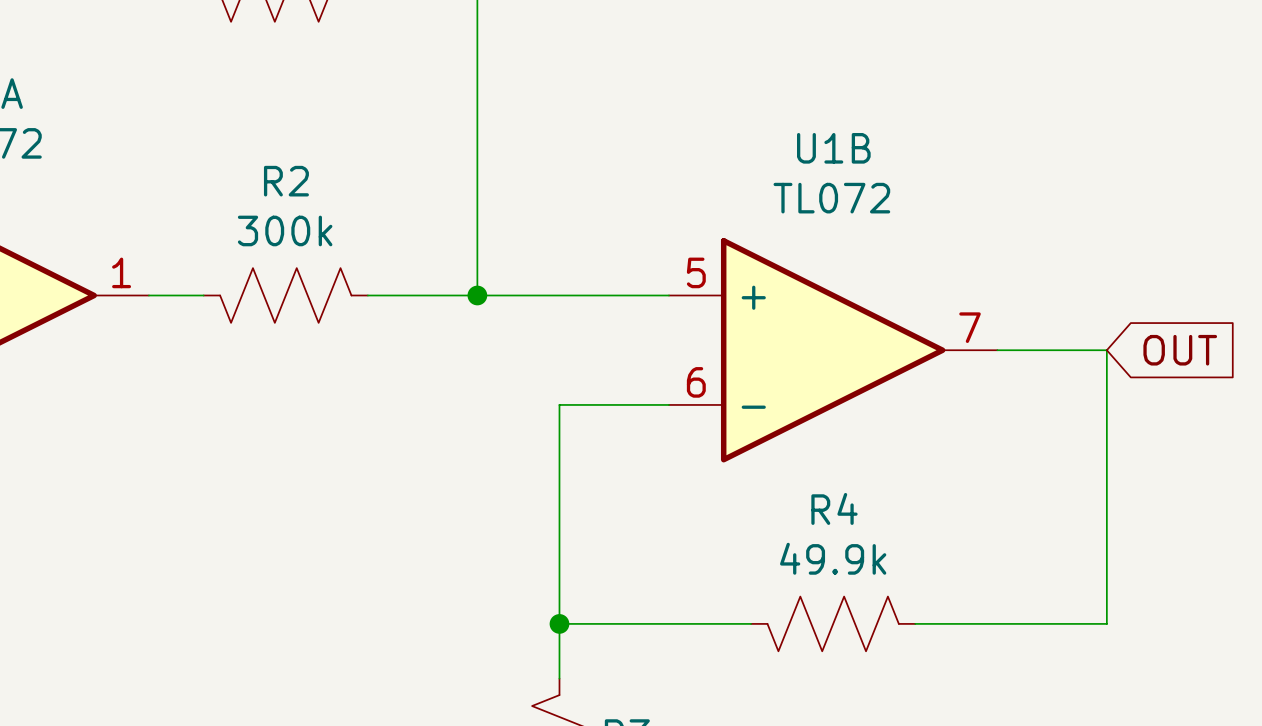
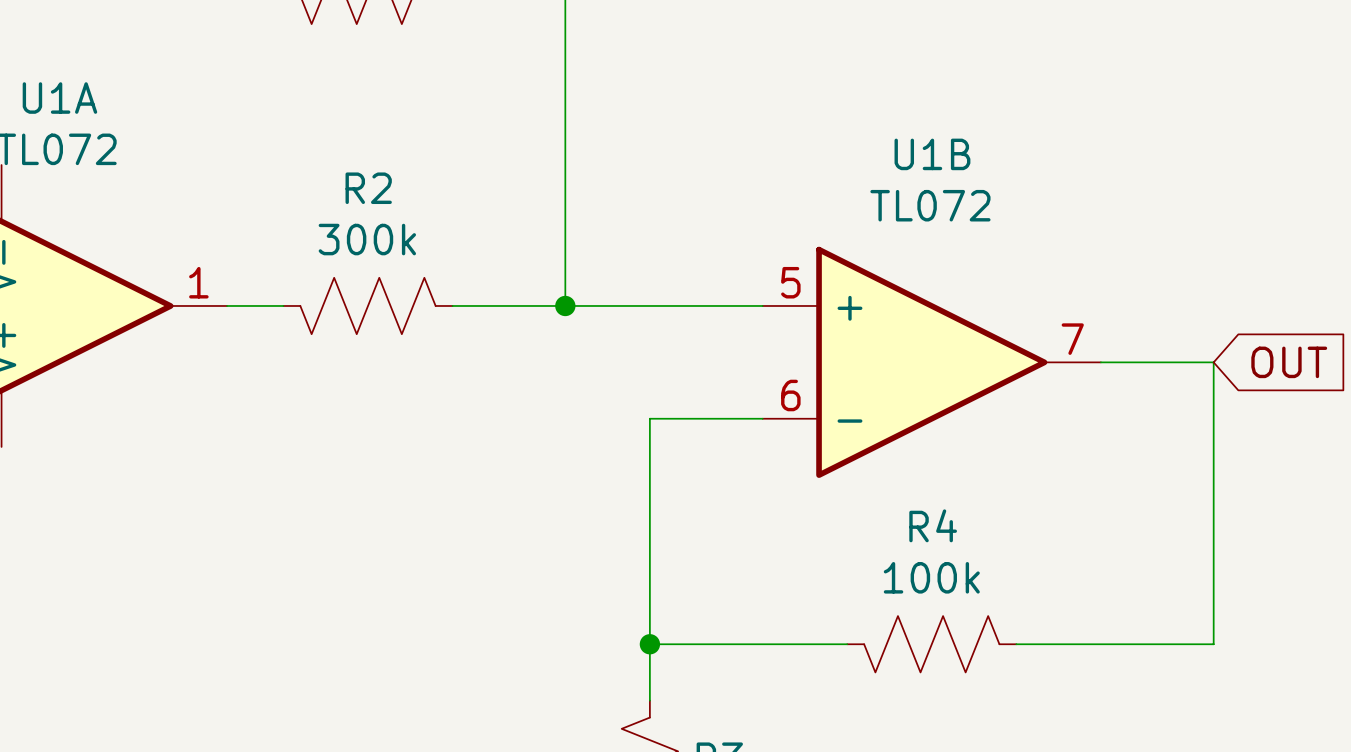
R4 value: 49.9k (833, 558) -> 100k (931, 577)

